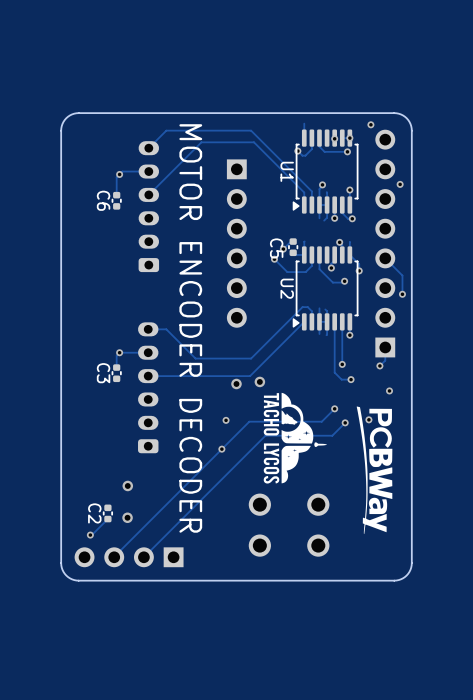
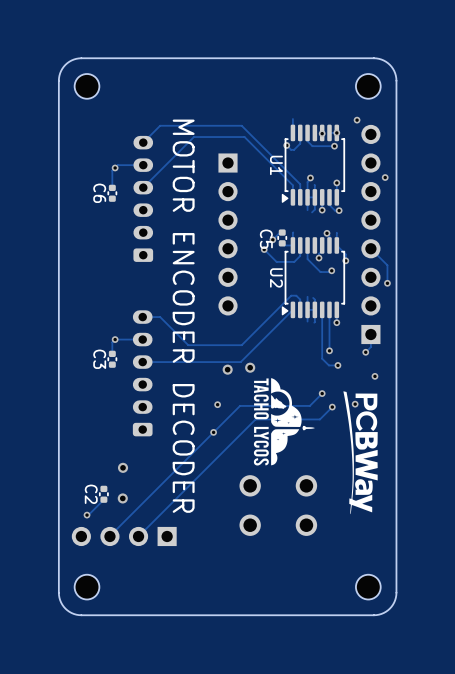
part: none -> (87, 86)
part: none -> (368, 86)
board edge: (411, 130) (406, 118) (394, 113) (78, 113) (66, 118) (61, 130) -> (396, 125) (395, 73) (387, 63) (373, 58) (76, 58) (65, 64) (59, 75) (58, 125)
board edge: (411, 563) (406, 575) (394, 580) (78, 580) (66, 575) (61, 563) -> (396, 542) (395, 600) (387, 610) (373, 615) (76, 614) (65, 608) (59, 597) (58, 542)
part: none -> (87, 587)
part: none -> (368, 587)

